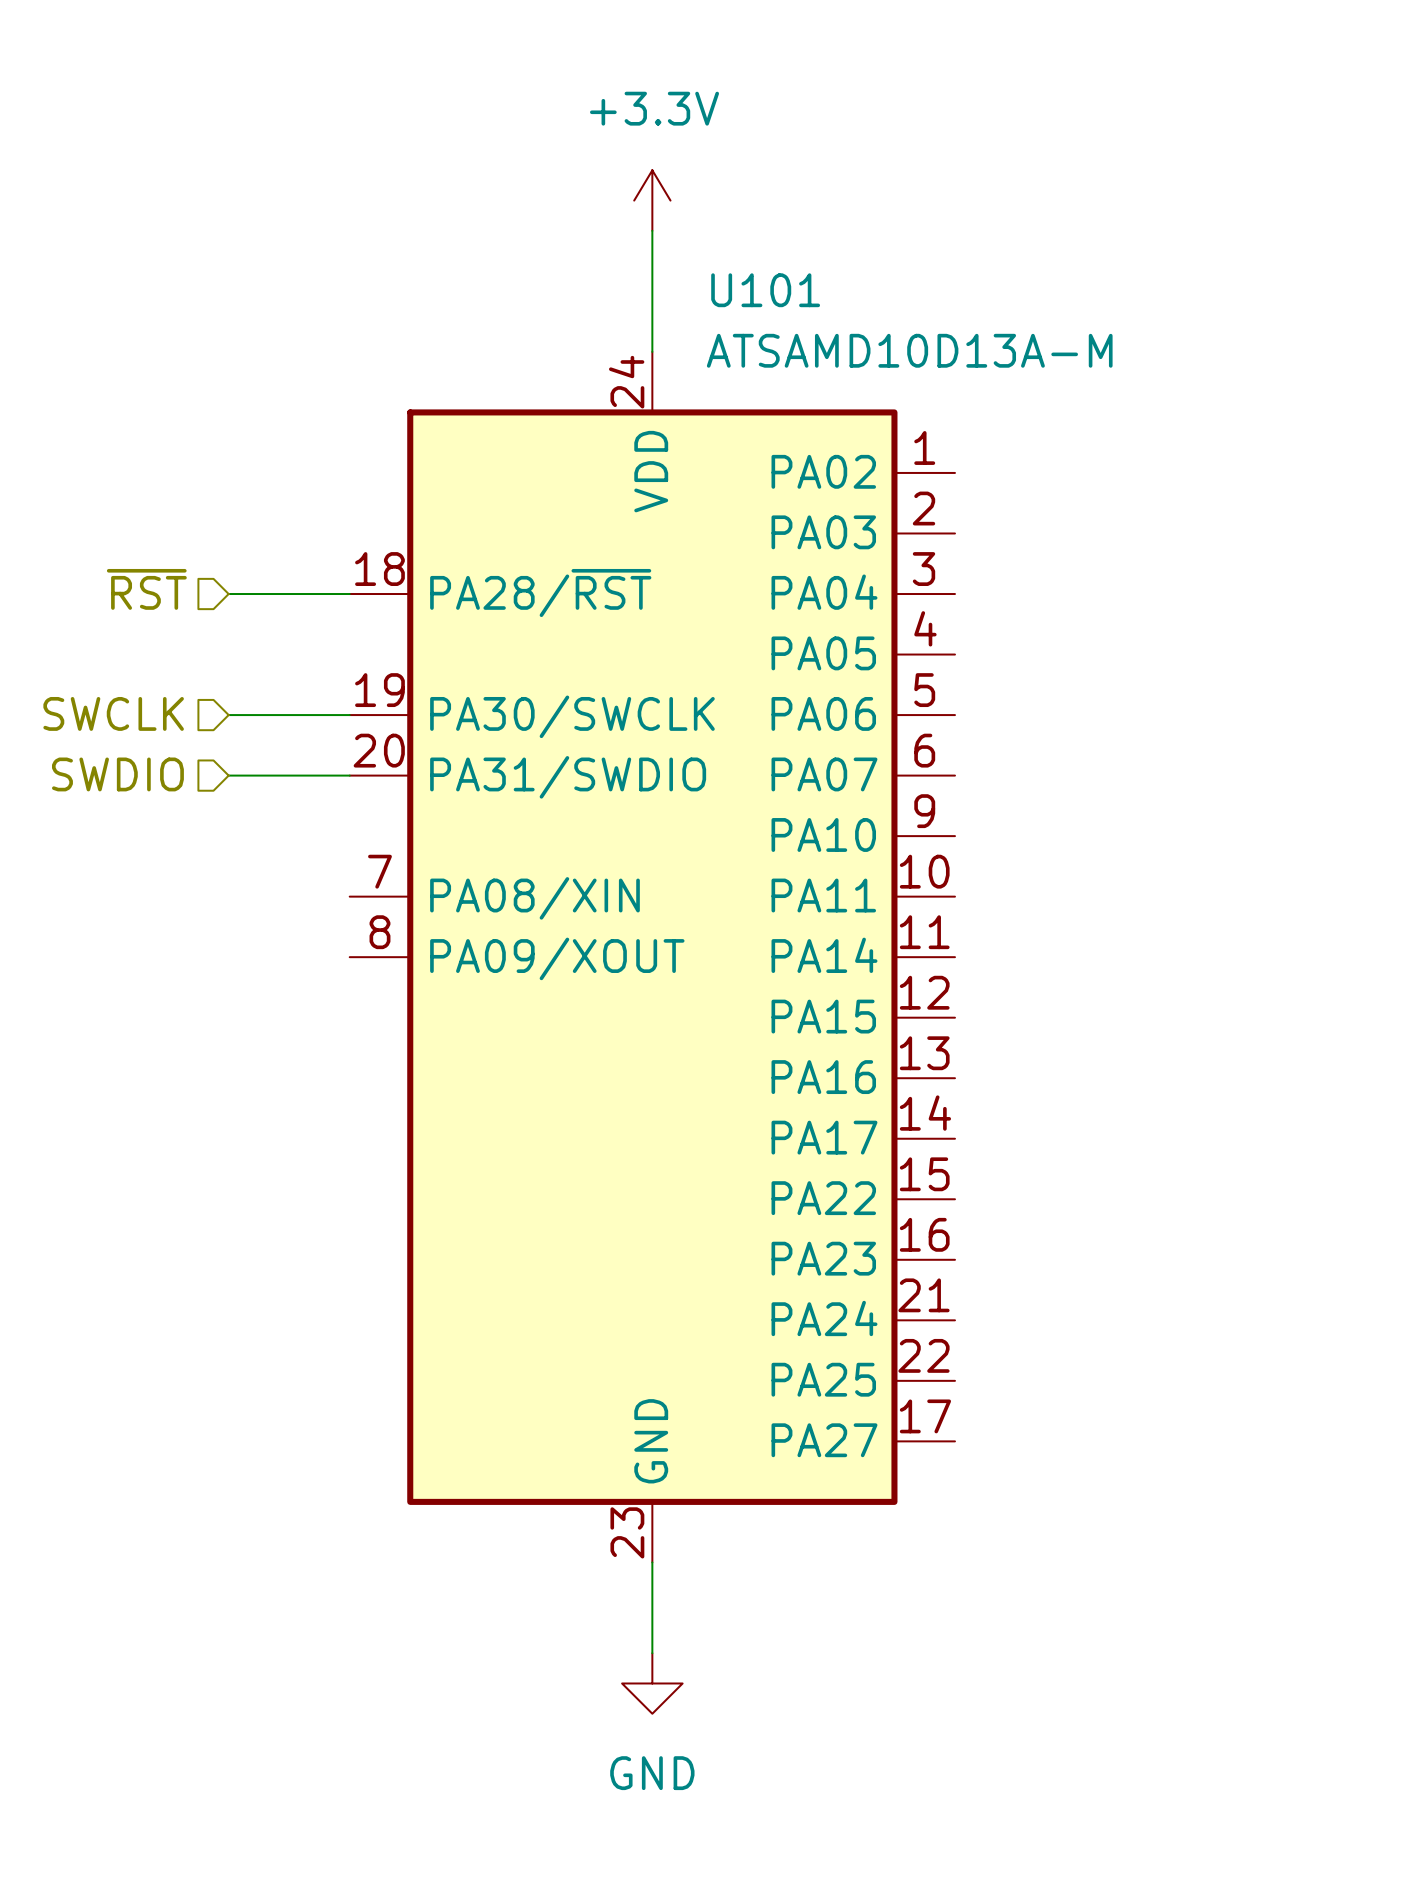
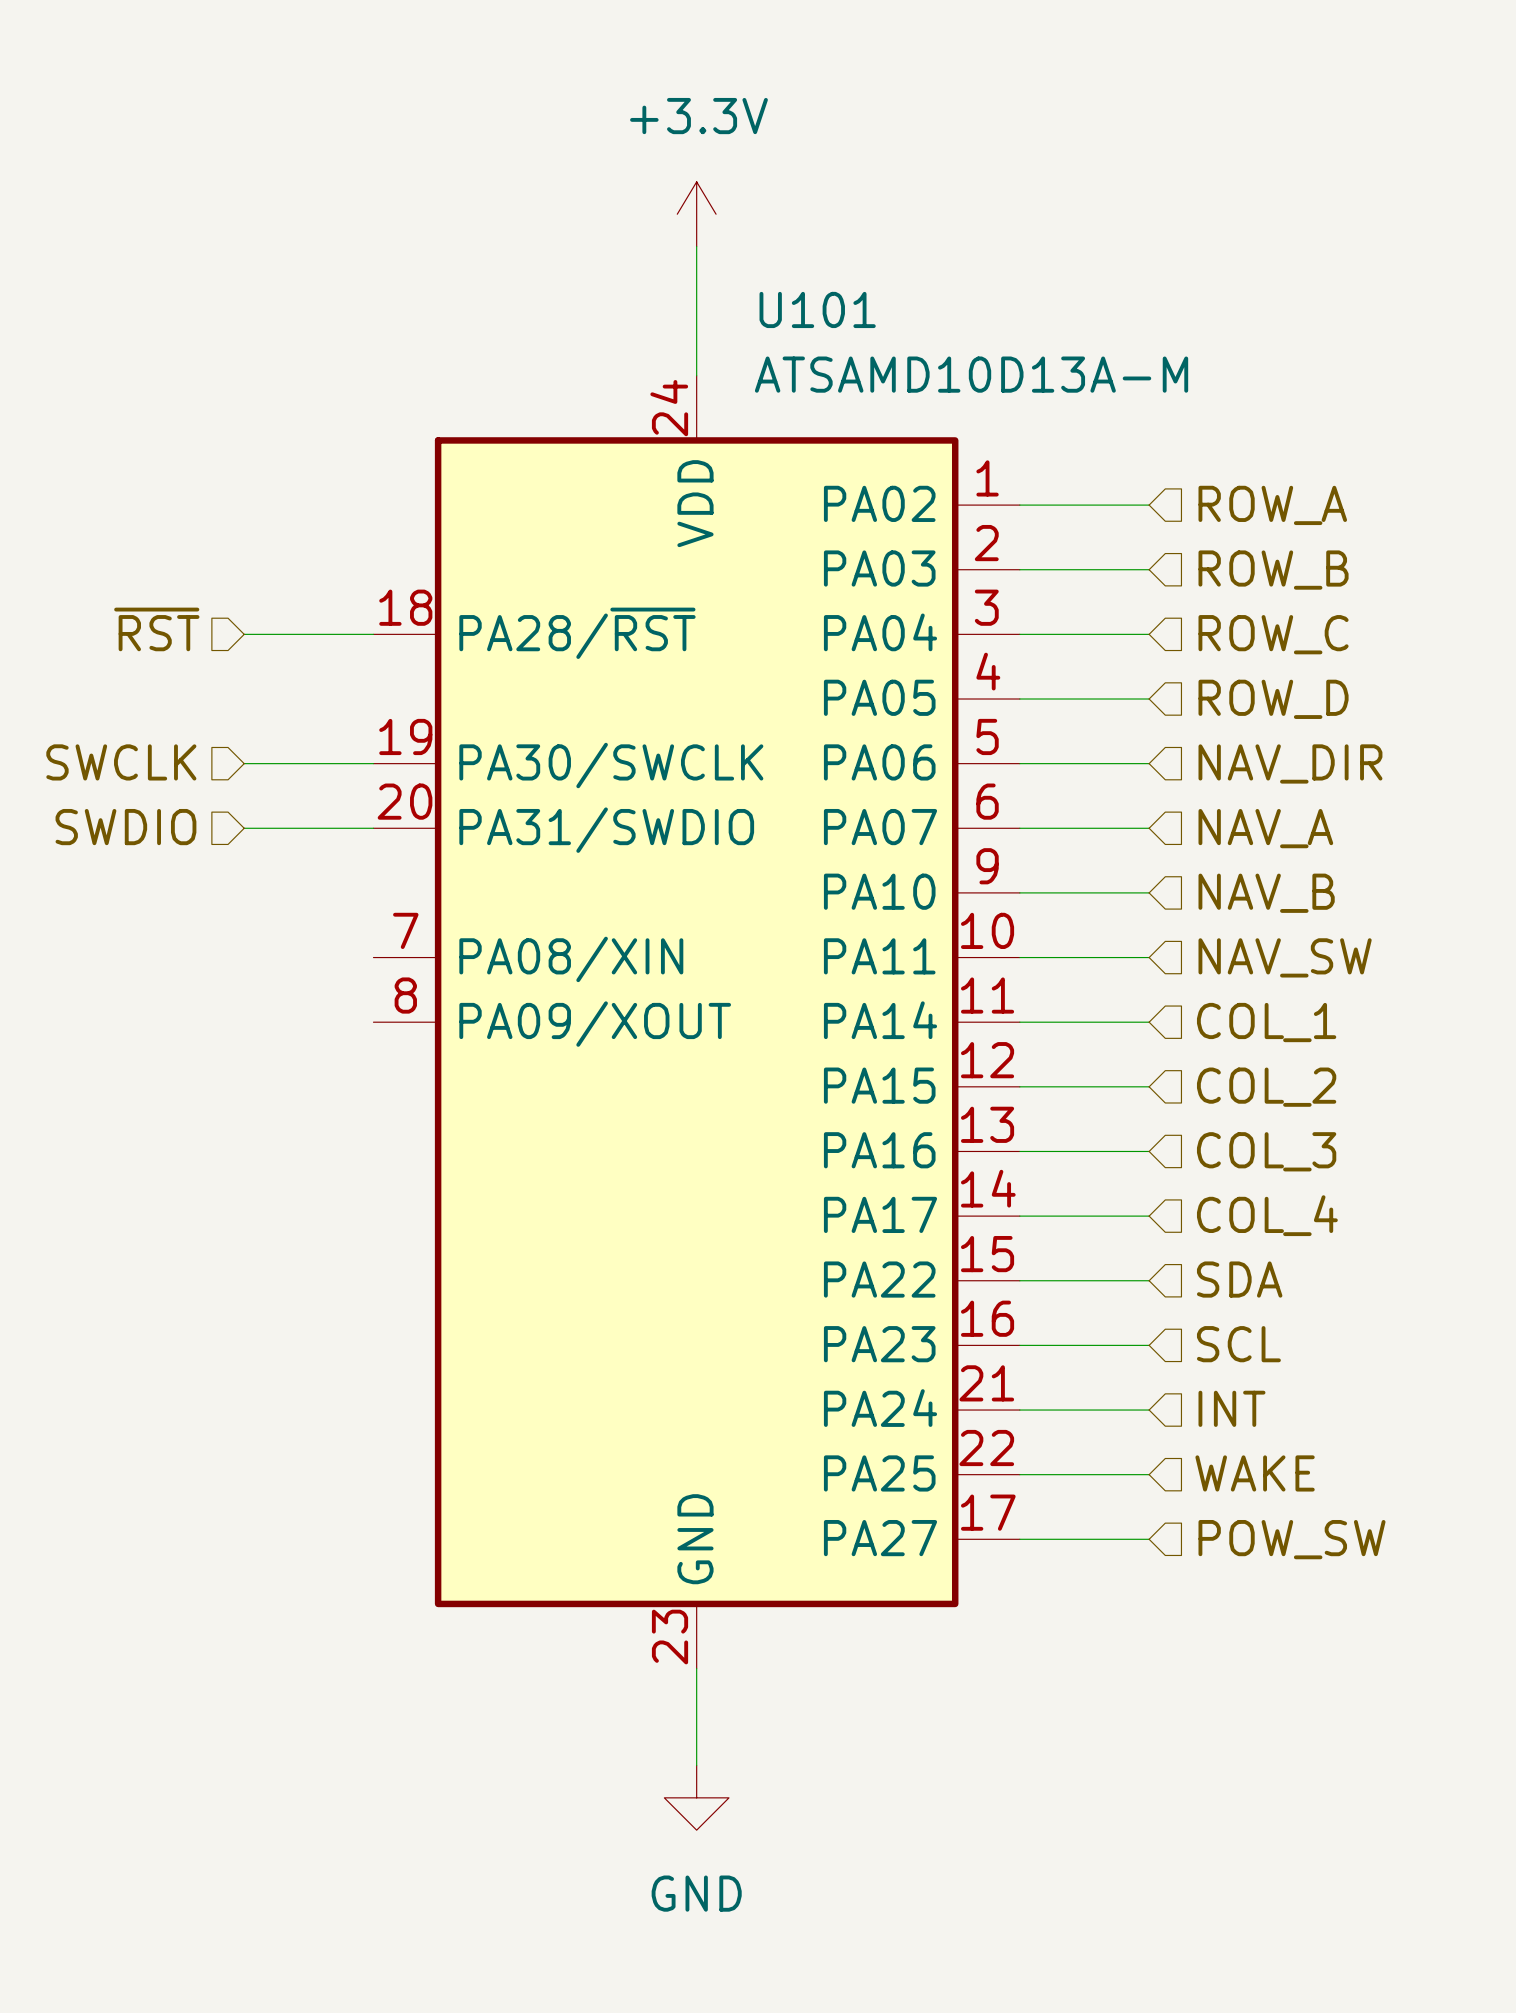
wire: none -> (1019, 505) (1149, 505)
hierarchical label: none -> ROW_A (1272, 505)
wire: none -> (1019, 569) (1149, 569)
hierarchical label: none -> ROW_B (1273, 570)
wire: none -> (1019, 634) (1149, 634)
hierarchical label: none -> ROW_C (1273, 634)
wire: none -> (1019, 699) (1149, 699)
hierarchical label: none -> ROW_D (1273, 699)
wire: none -> (1019, 763) (1149, 763)
hierarchical label: none -> NAV_DIR (1290, 763)
wire: none -> (1019, 828) (1149, 828)
hierarchical label: none -> NAV_A (1265, 828)
wire: none -> (1019, 892) (1149, 892)
hierarchical label: none -> NAV_B (1266, 893)
wire: none -> (1019, 957) (1149, 957)
hierarchical label: none -> NAV_SW (1285, 957)
wire: none -> (1019, 1022) (1149, 1022)
hierarchical label: none -> COL_1 (1266, 1022)
wire: none -> (1019, 1086) (1149, 1086)
hierarchical label: none -> COL_2 (1266, 1087)
wire: none -> (1019, 1151) (1149, 1151)
hierarchical label: none -> COL_3 (1266, 1151)
wire: none -> (1019, 1216) (1149, 1216)
hierarchical label: none -> COL_4 (1267, 1215)
hierarchical label: none -> SDA (1239, 1279)
wire: none -> (1019, 1280) (1149, 1280)
hierarchical label: none -> SCL (1238, 1344)
wire: none -> (1019, 1345) (1149, 1345)
hierarchical label: none -> INT (1231, 1408)
wire: none -> (1019, 1410) (1149, 1410)
hierarchical label: none -> WAKE (1255, 1473)
wire: none -> (1019, 1474) (1149, 1474)
wire: none -> (1019, 1539) (1149, 1539)
hierarchical label: none -> POW_SW (1292, 1539)

